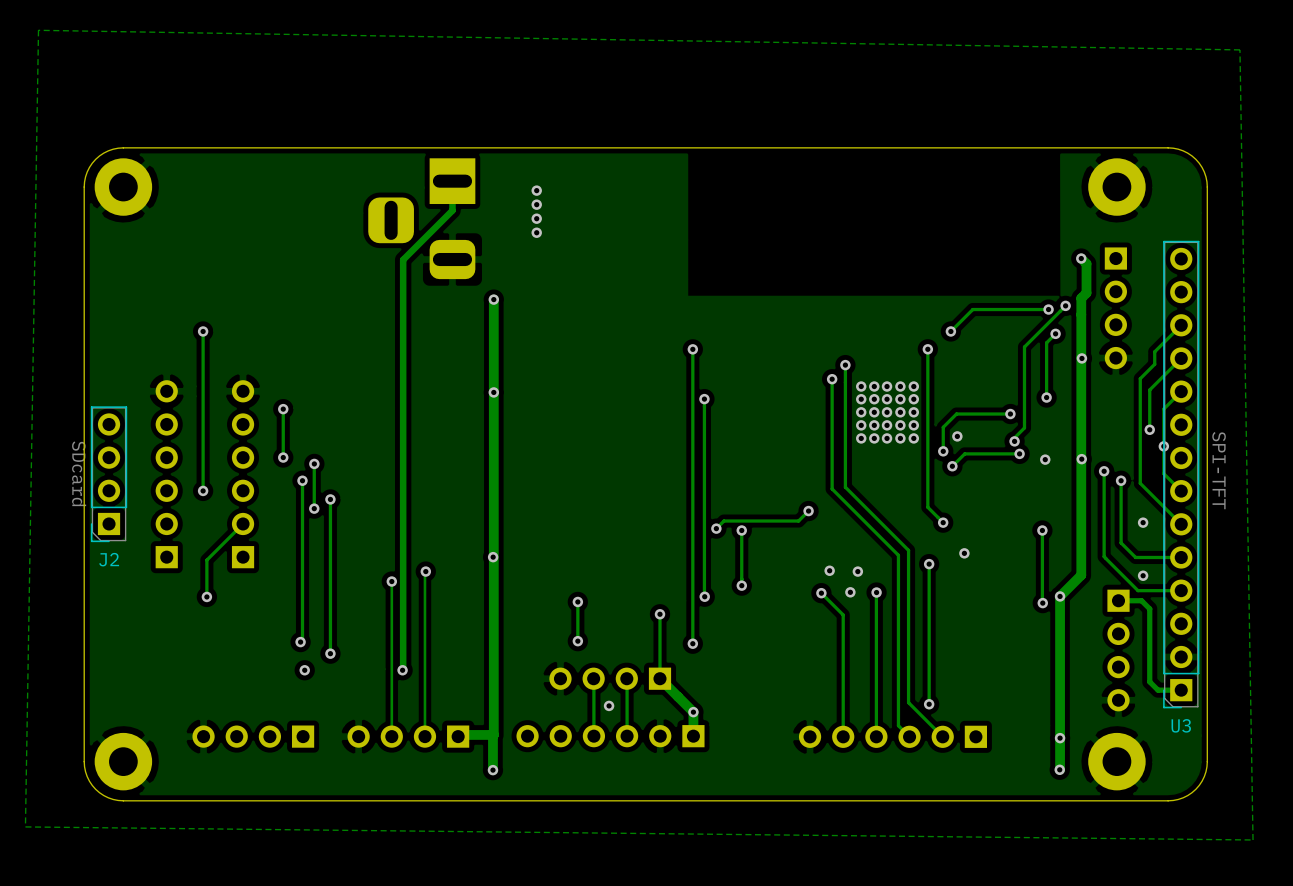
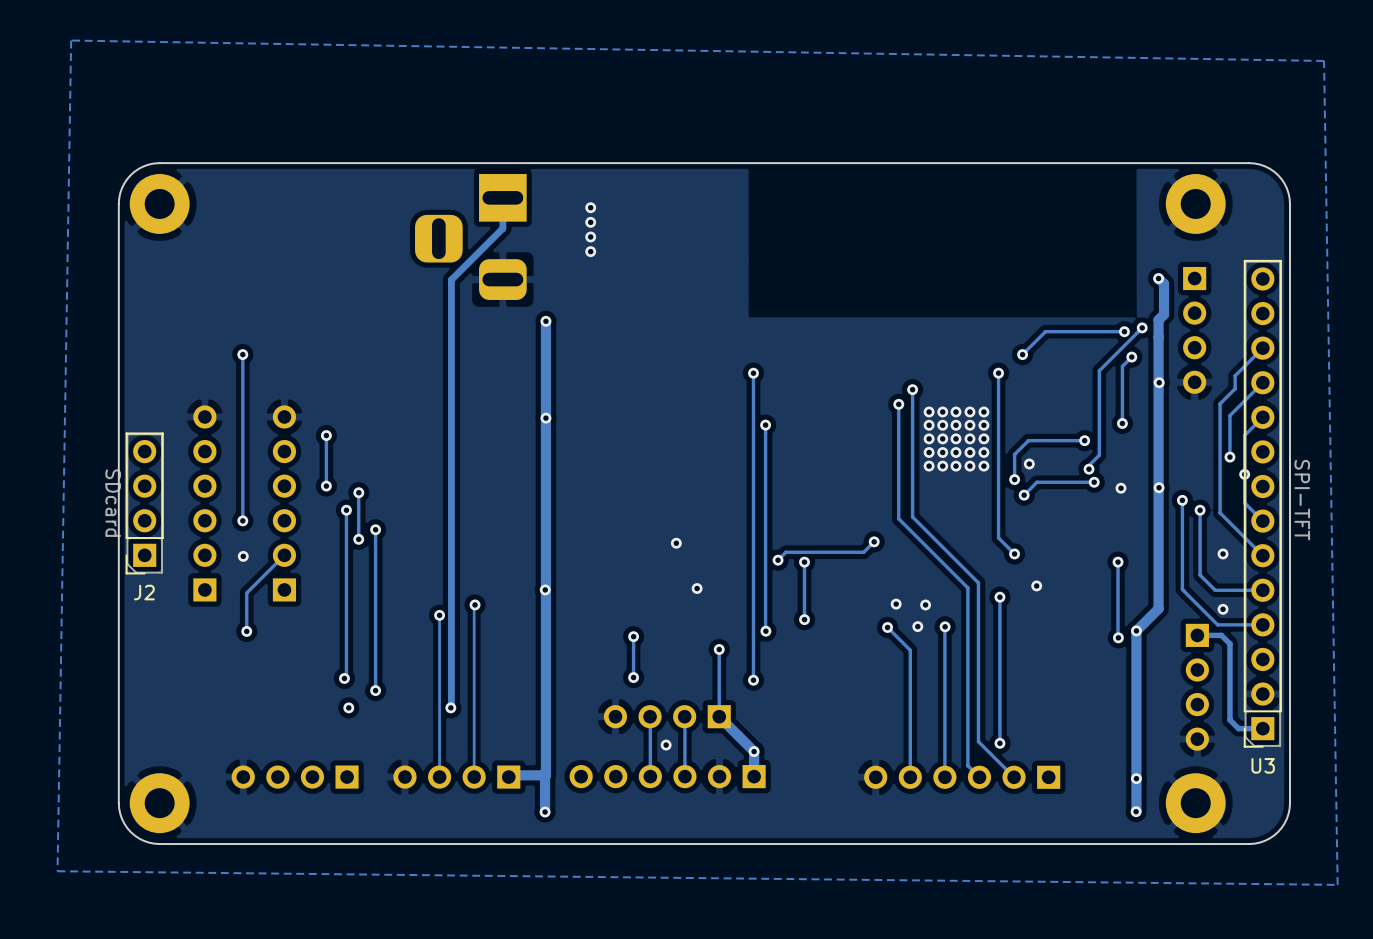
via: none -> (676, 543)
via: none -> (243, 556)
via: none -> (697, 588)

